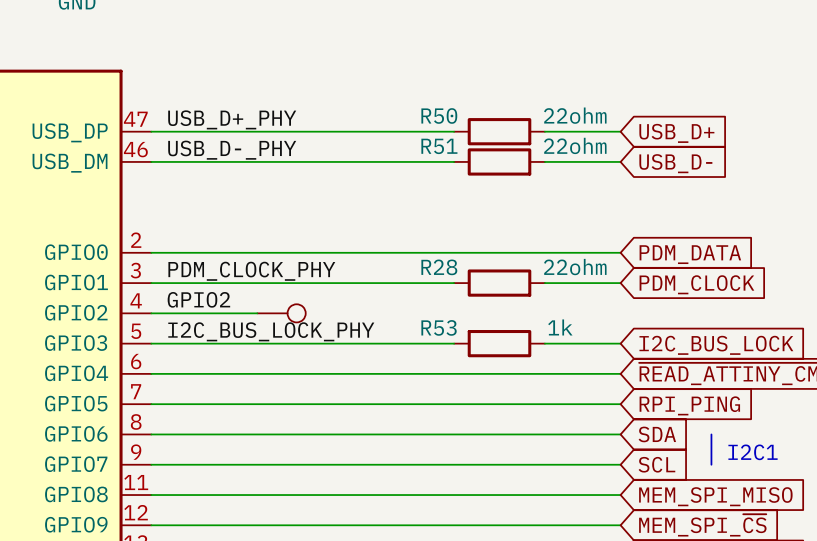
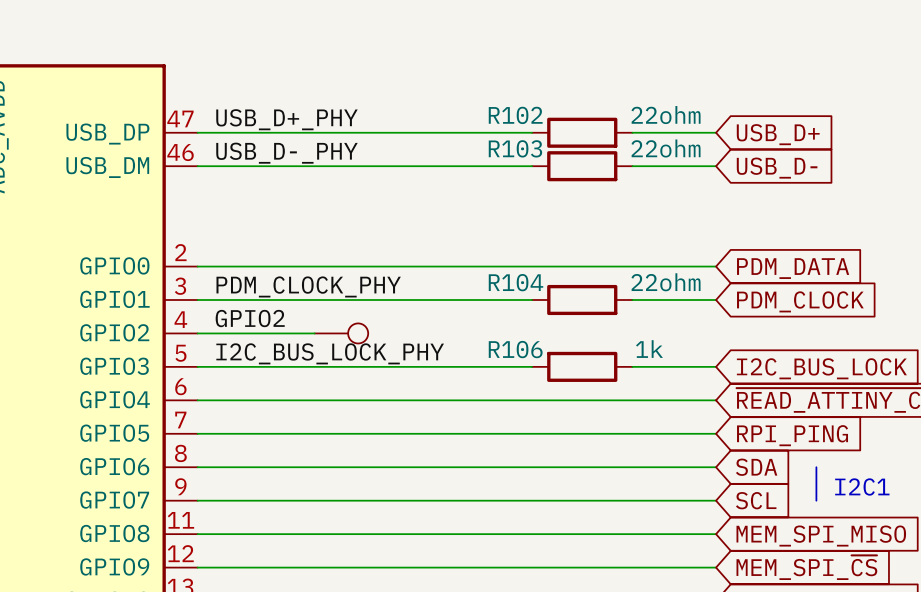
R50 name: R50 (439, 115) -> R102 (515, 115)
R51 name: R51 (439, 146) -> R103 (515, 148)
R28 name: R28 (439, 267) -> R104 (515, 282)
R53 name: R53 (439, 327) -> R106 (515, 349)

